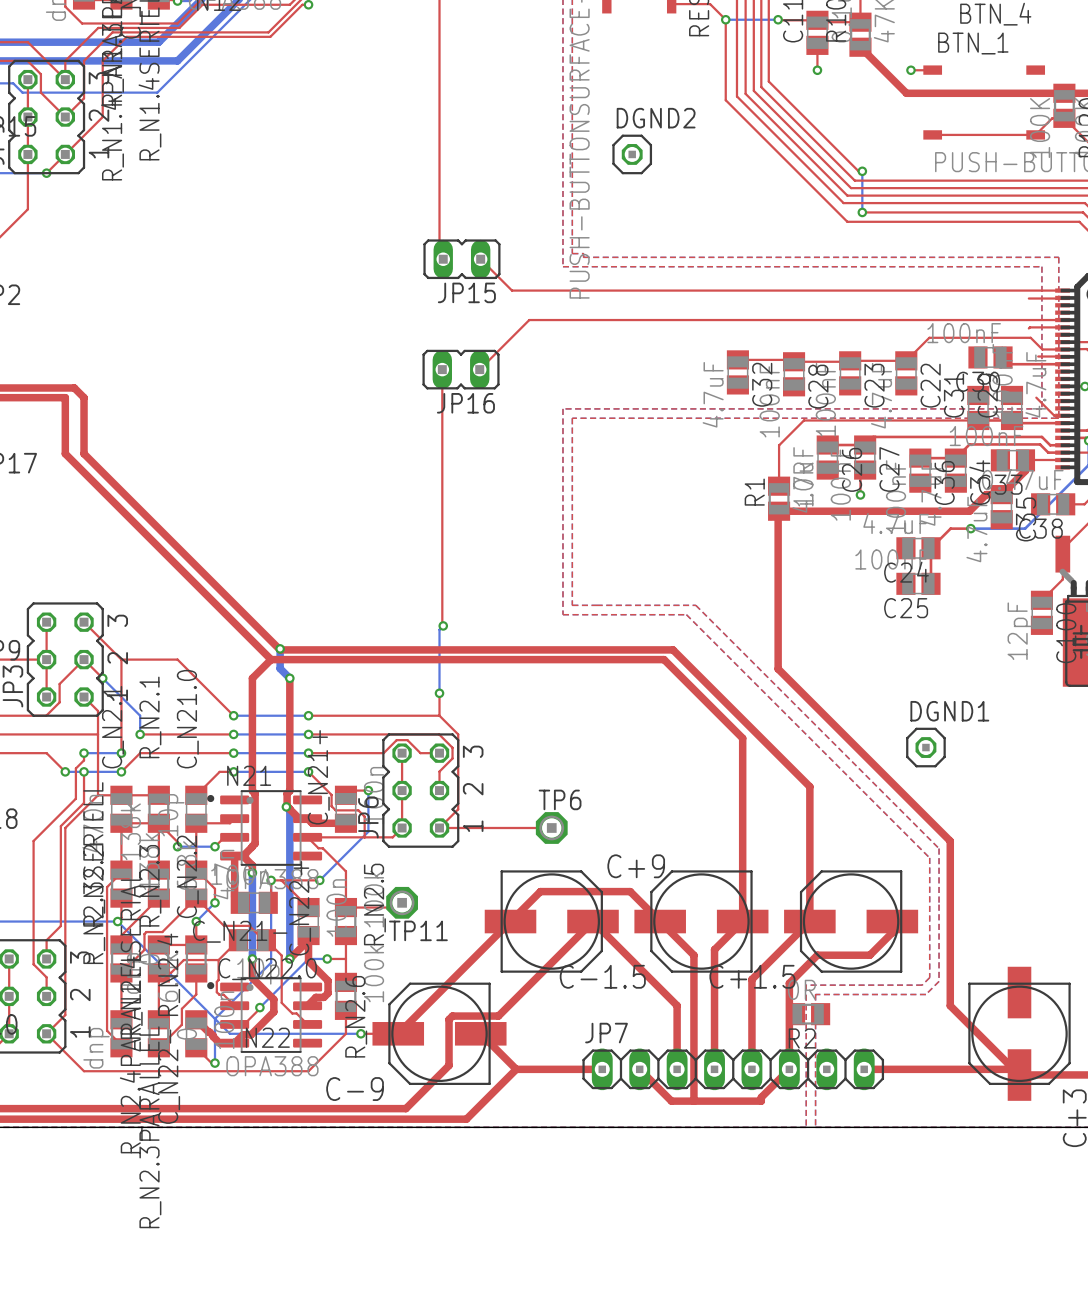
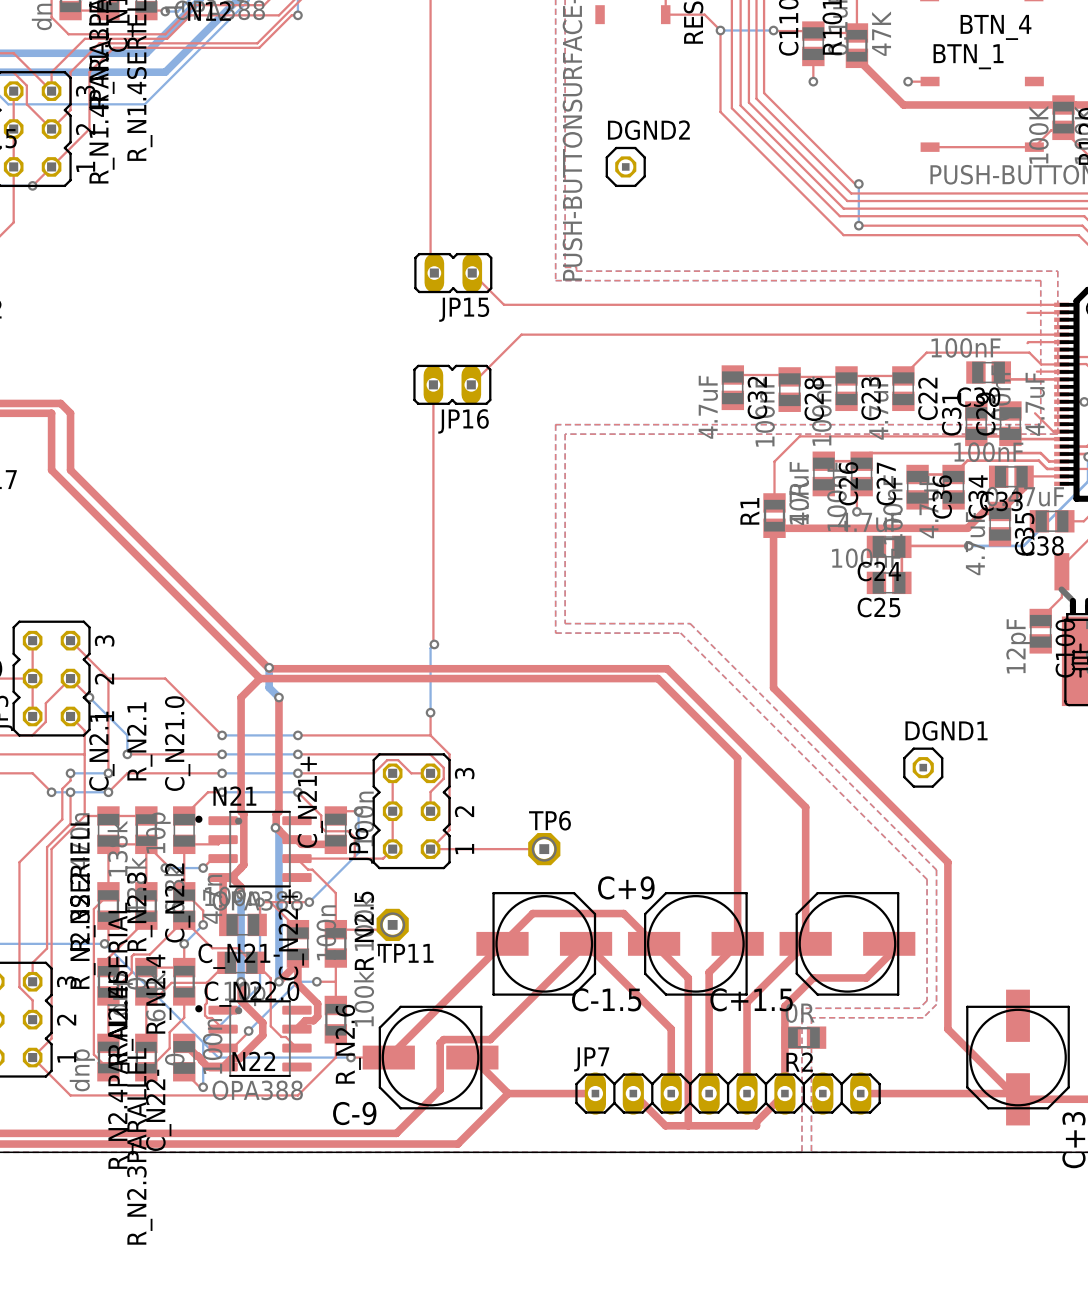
top track: (950, 528) (930, 548) (930, 583) -> (948, 545) (902, 545) (901, 582)
C24 position: (918, 548) -> (889, 546)
C25 position: (918, 583) -> (889, 582)

